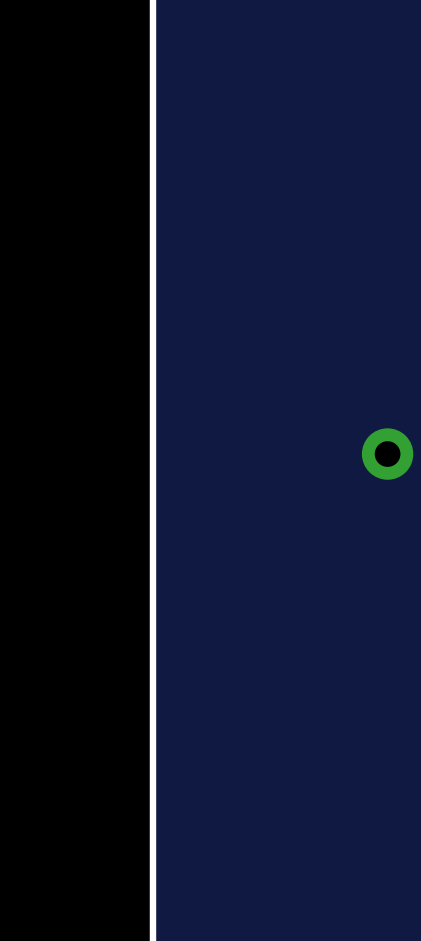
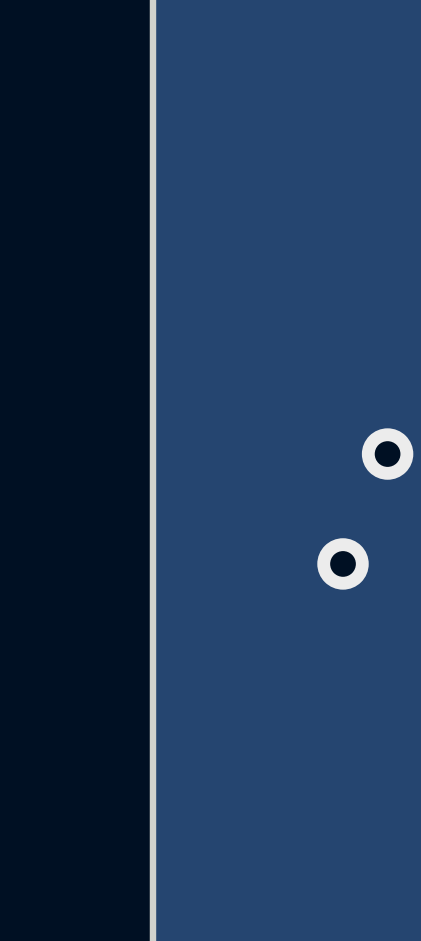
via: none -> (343, 563)

